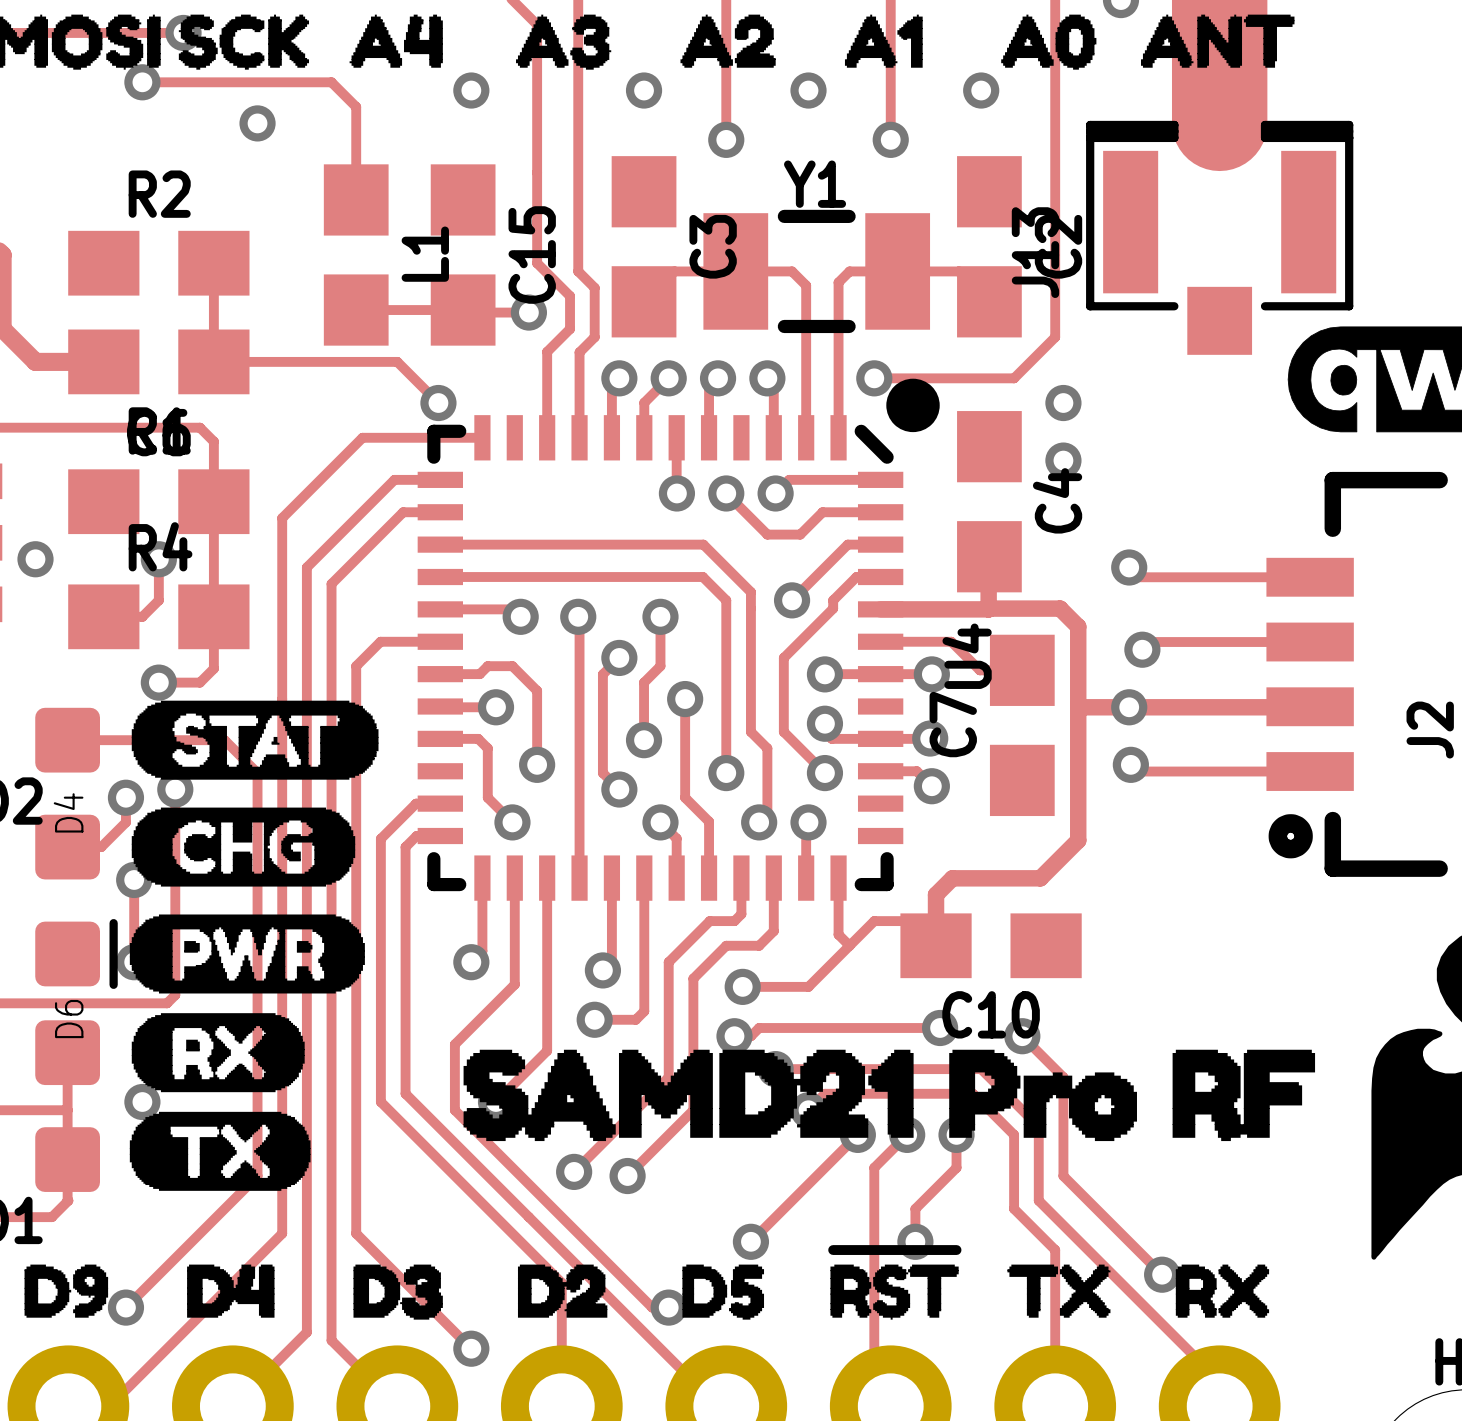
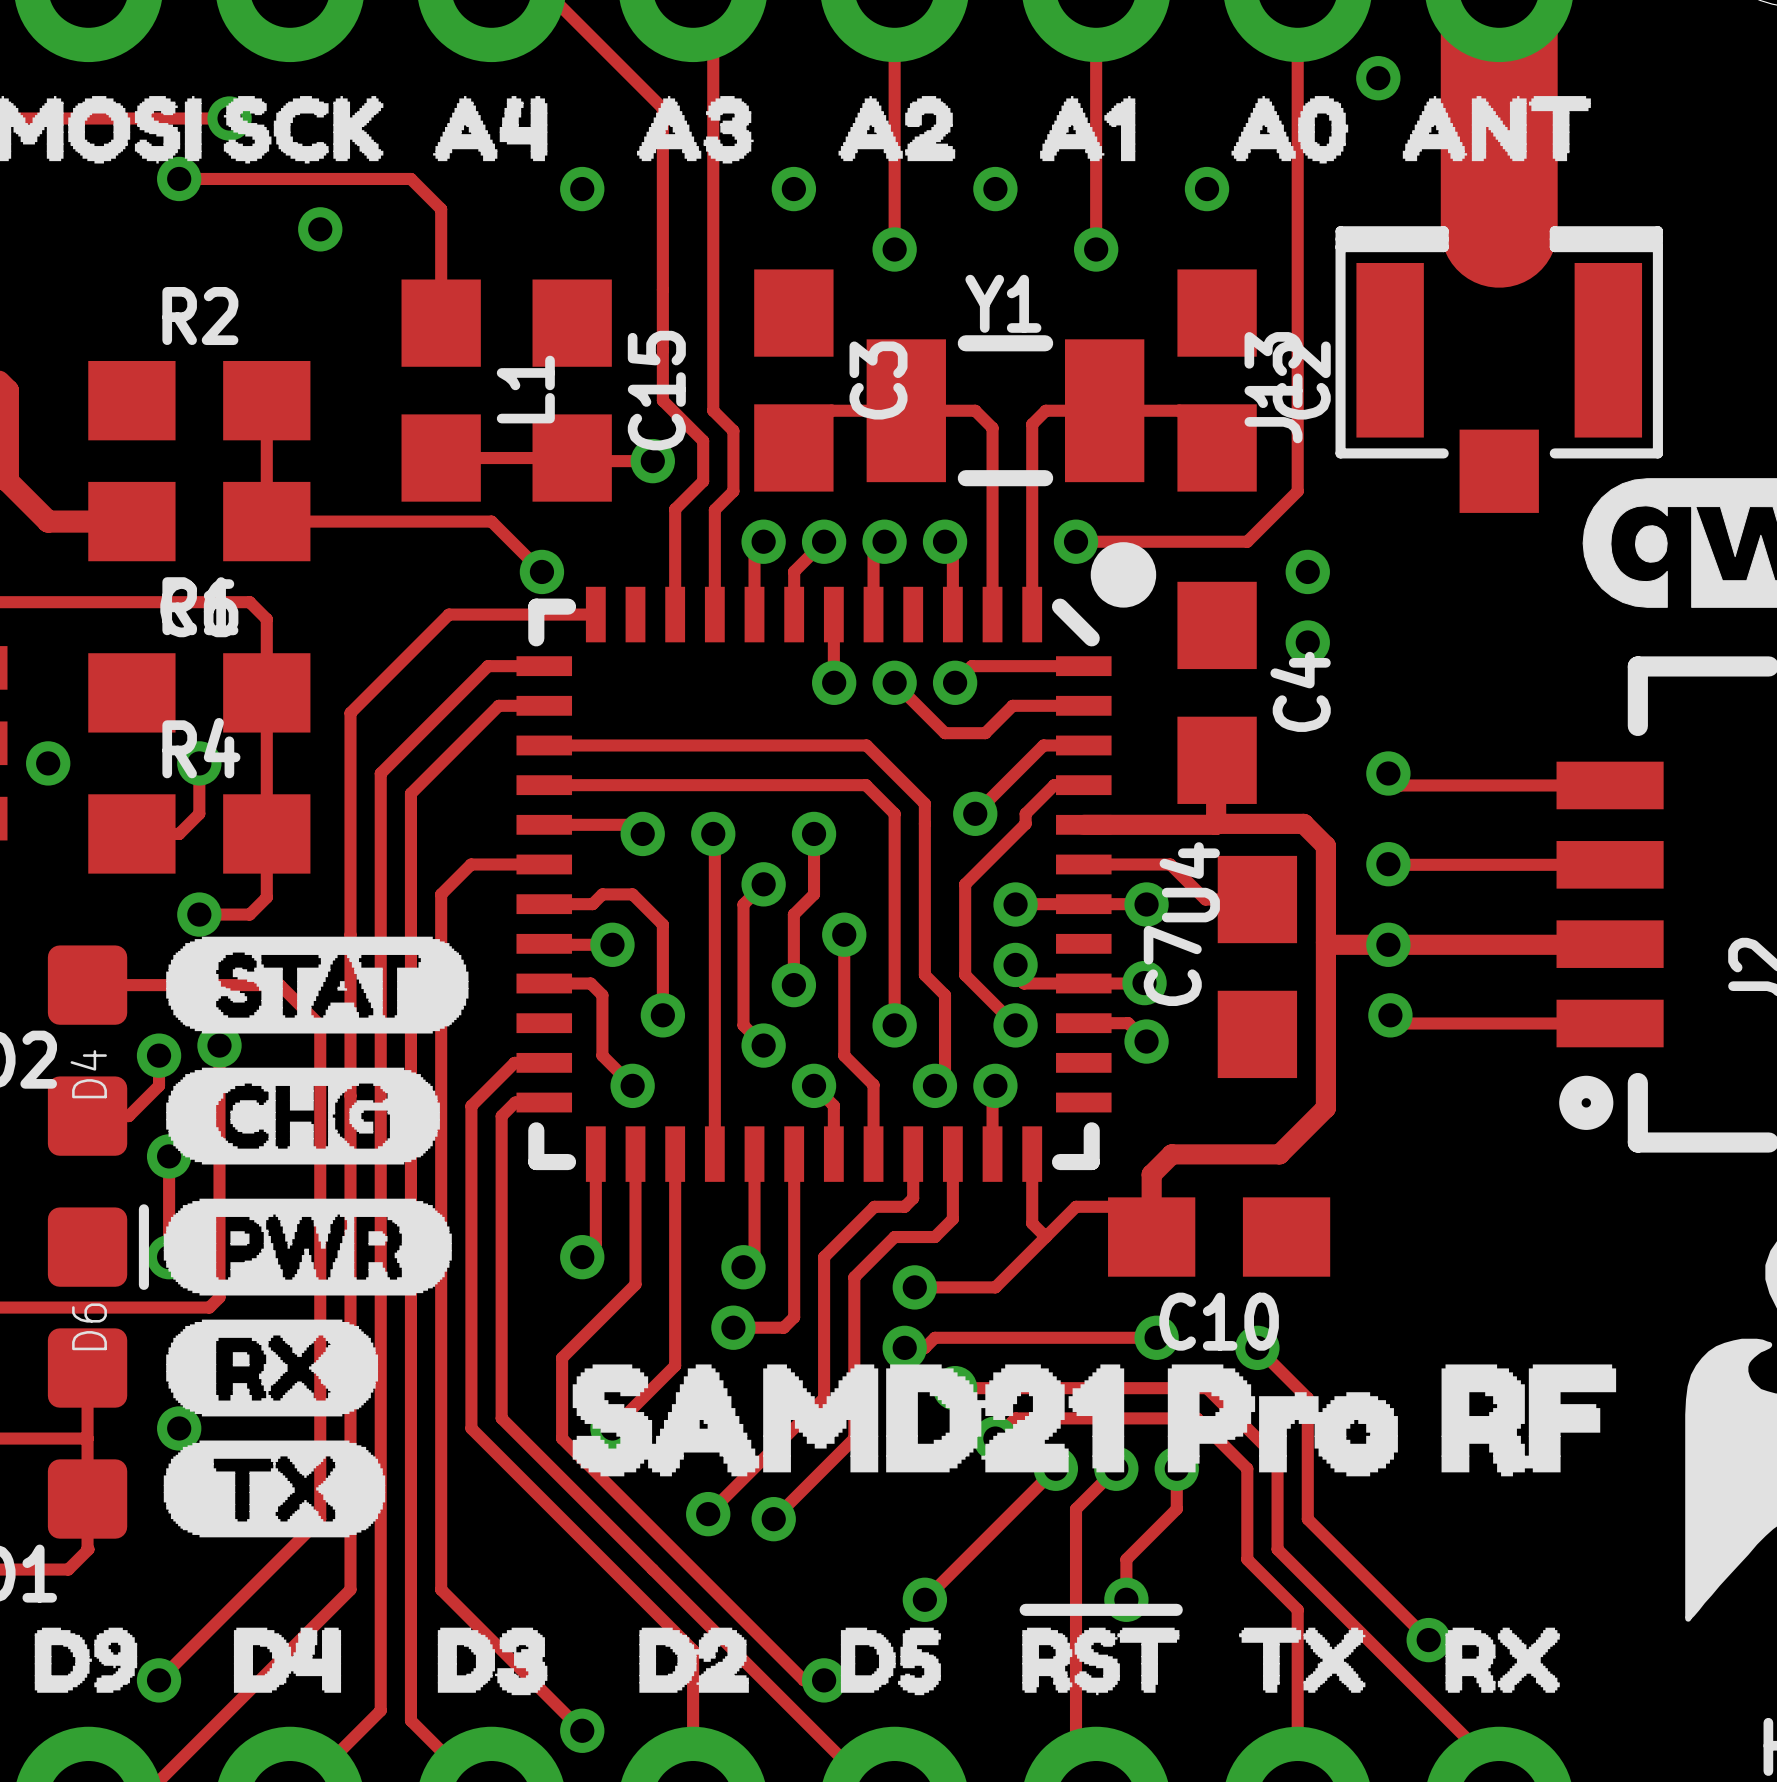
via position: (1142, 649) -> (1388, 864)

